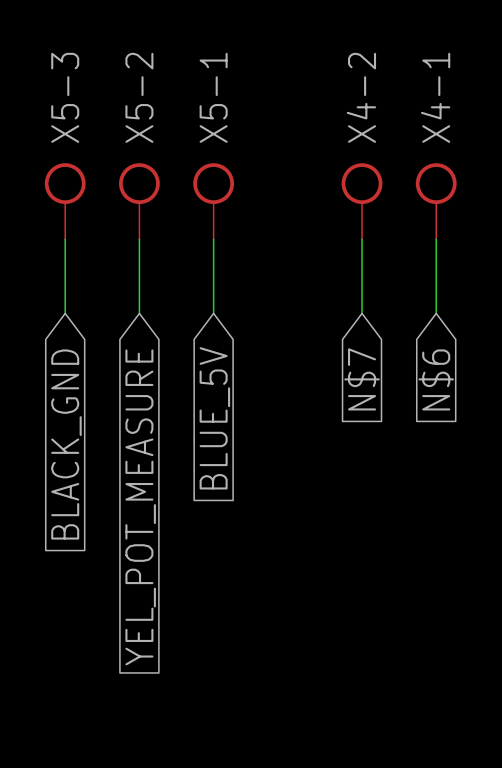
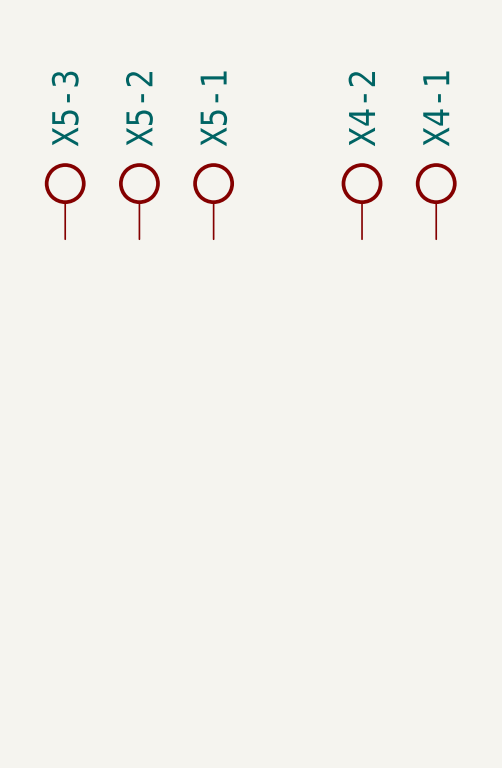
wire: (65, 239) (65, 313) -> none
wire: (139, 239) (139, 313) -> none
wire: (213, 239) (213, 313) -> none
wire: (362, 239) (362, 313) -> none
wire: (436, 239) (436, 313) -> none
global label: N$7 (362, 379) -> none
global label: N$6 (436, 379) -> none
global label: BLUE_5V (214, 418) -> none
global label: BLACK_GND (66, 444) -> none
global label: YEL_POT_MEASURE (140, 507) -> none

